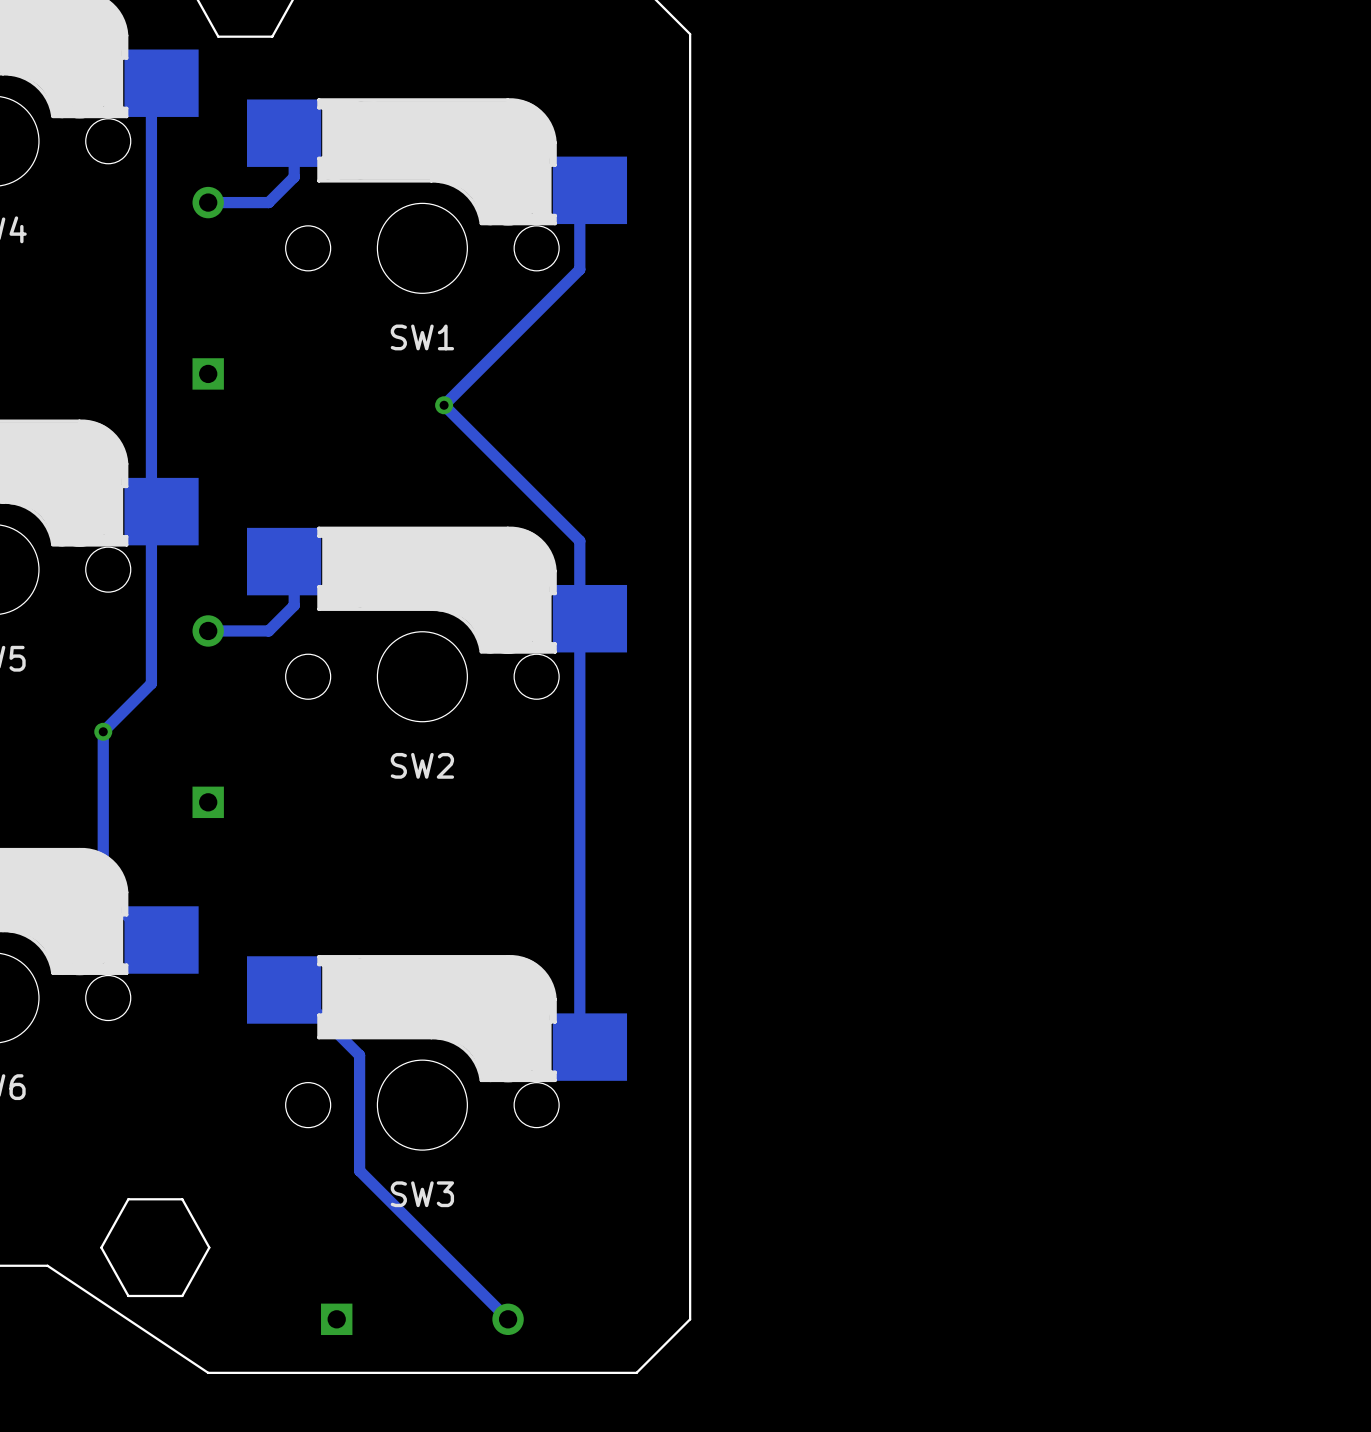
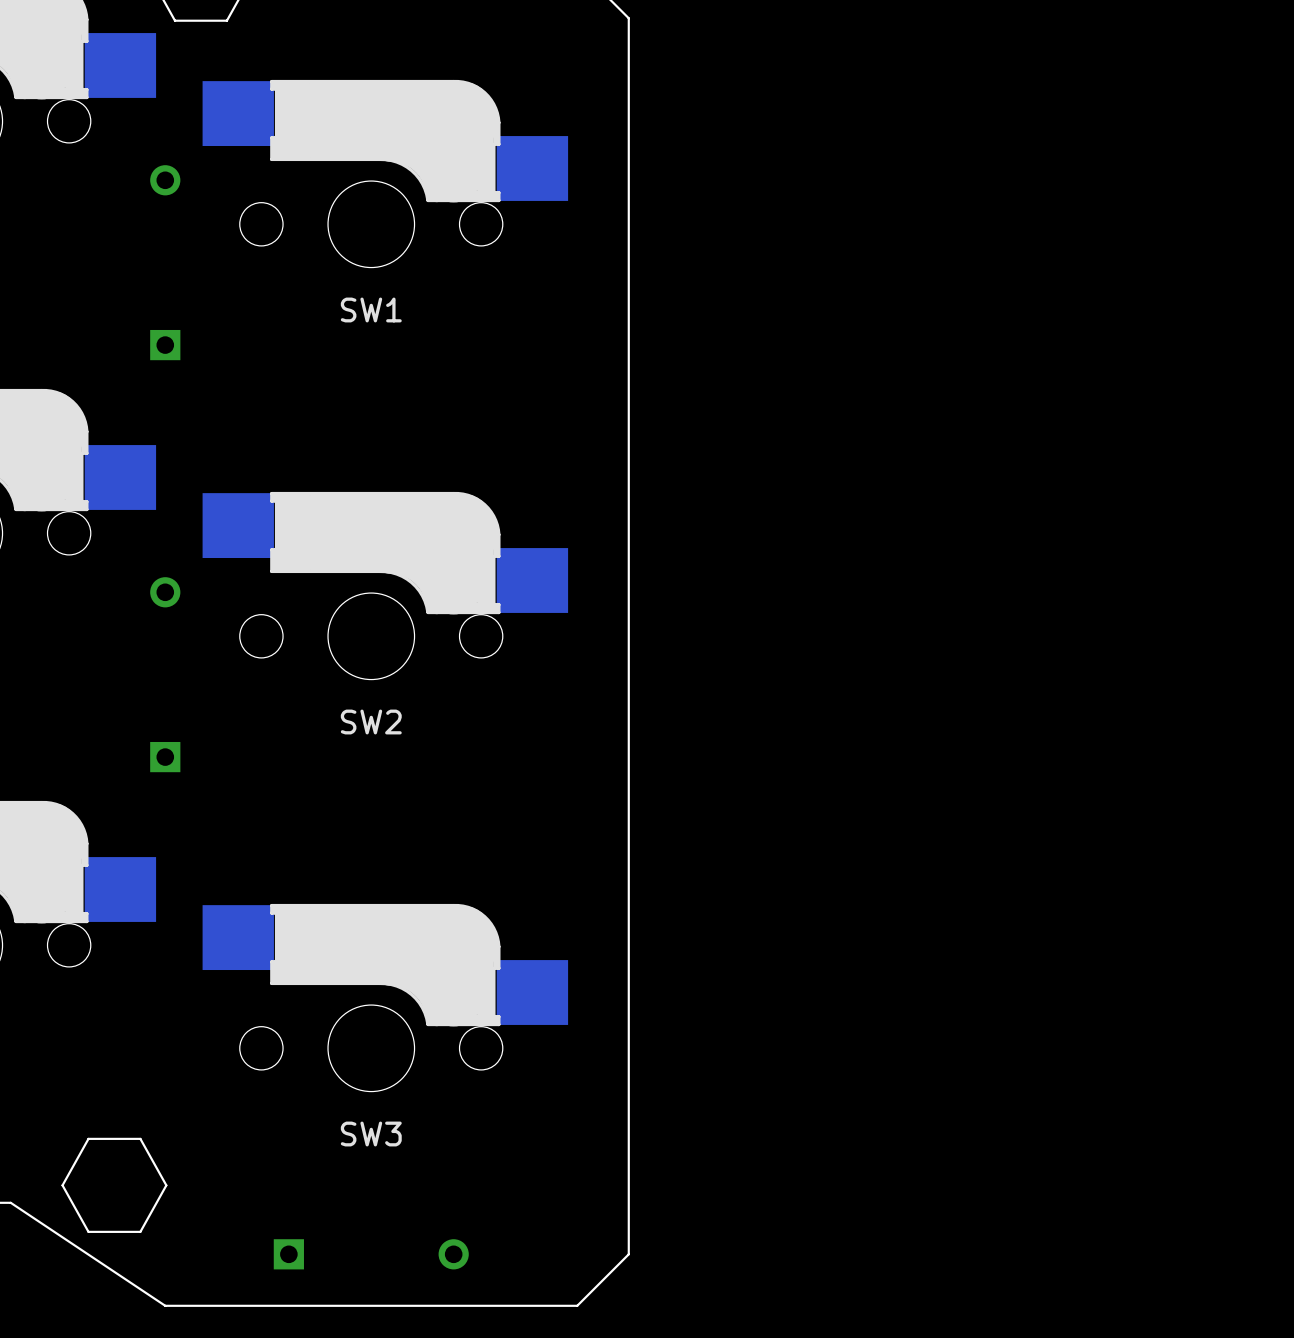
track: (151, 83) (151, 683) (103, 731) (103, 891) (151, 940) -> none
track: (294, 133) (294, 177) (268, 202) (208, 202) -> none
track: (579, 190) (579, 269) (444, 405) (579, 540) (579, 1047) -> none
via: (444, 405) -> none
track: (294, 561) (294, 605) (268, 630) (208, 630) -> none
via: (103, 731) -> none
track: (294, 989) (359, 1055) (359, 1170) (508, 1319) -> none

